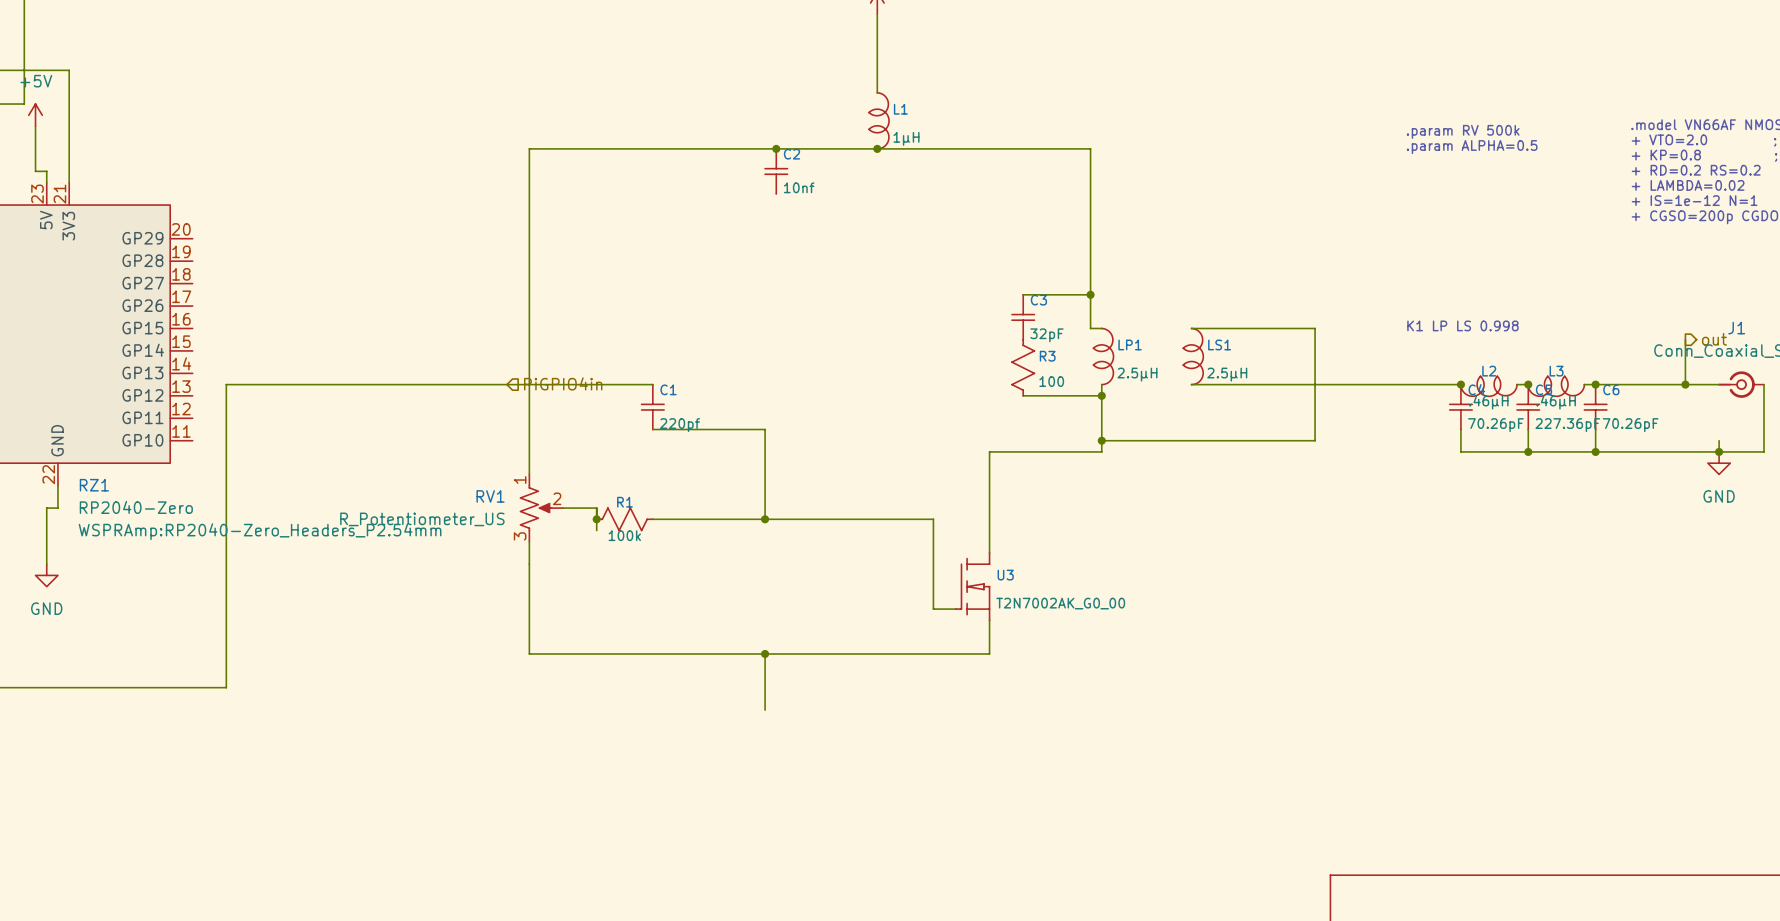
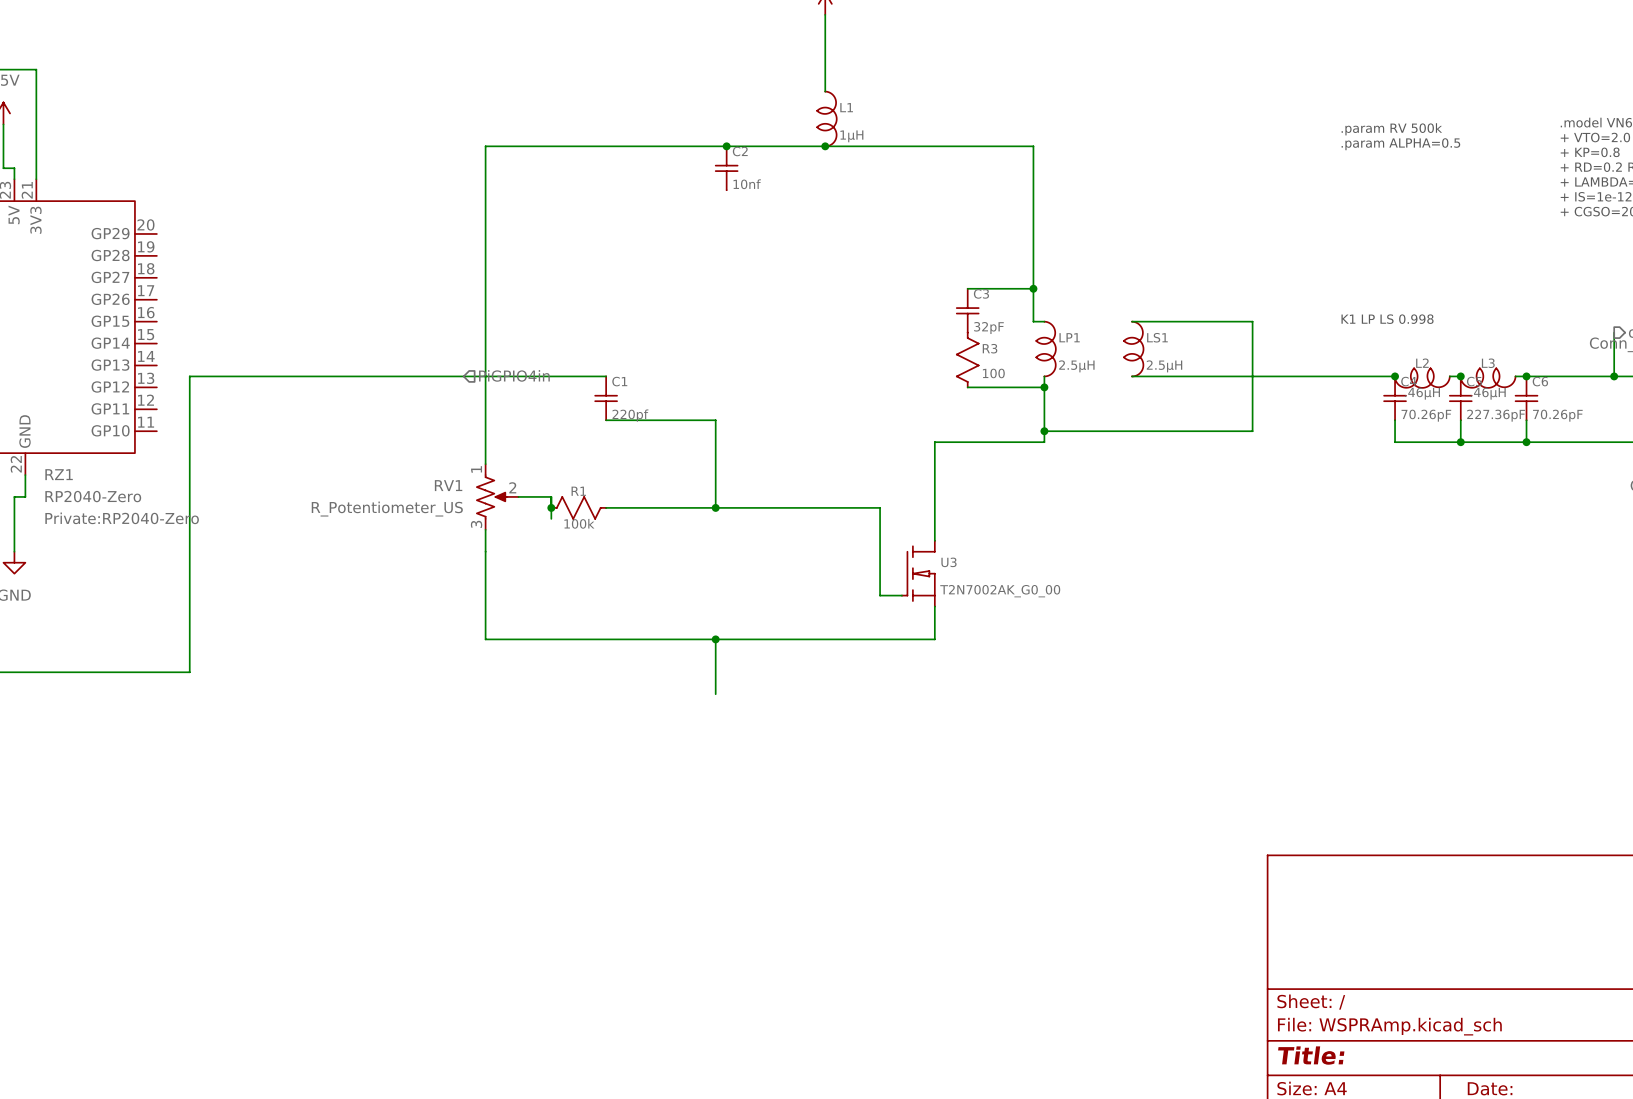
RZ1 text: WSPRAmp:RP2040-Zero_Headers_P2.54mm (260, 531) -> Private:RP2040-Zero (122, 518)

